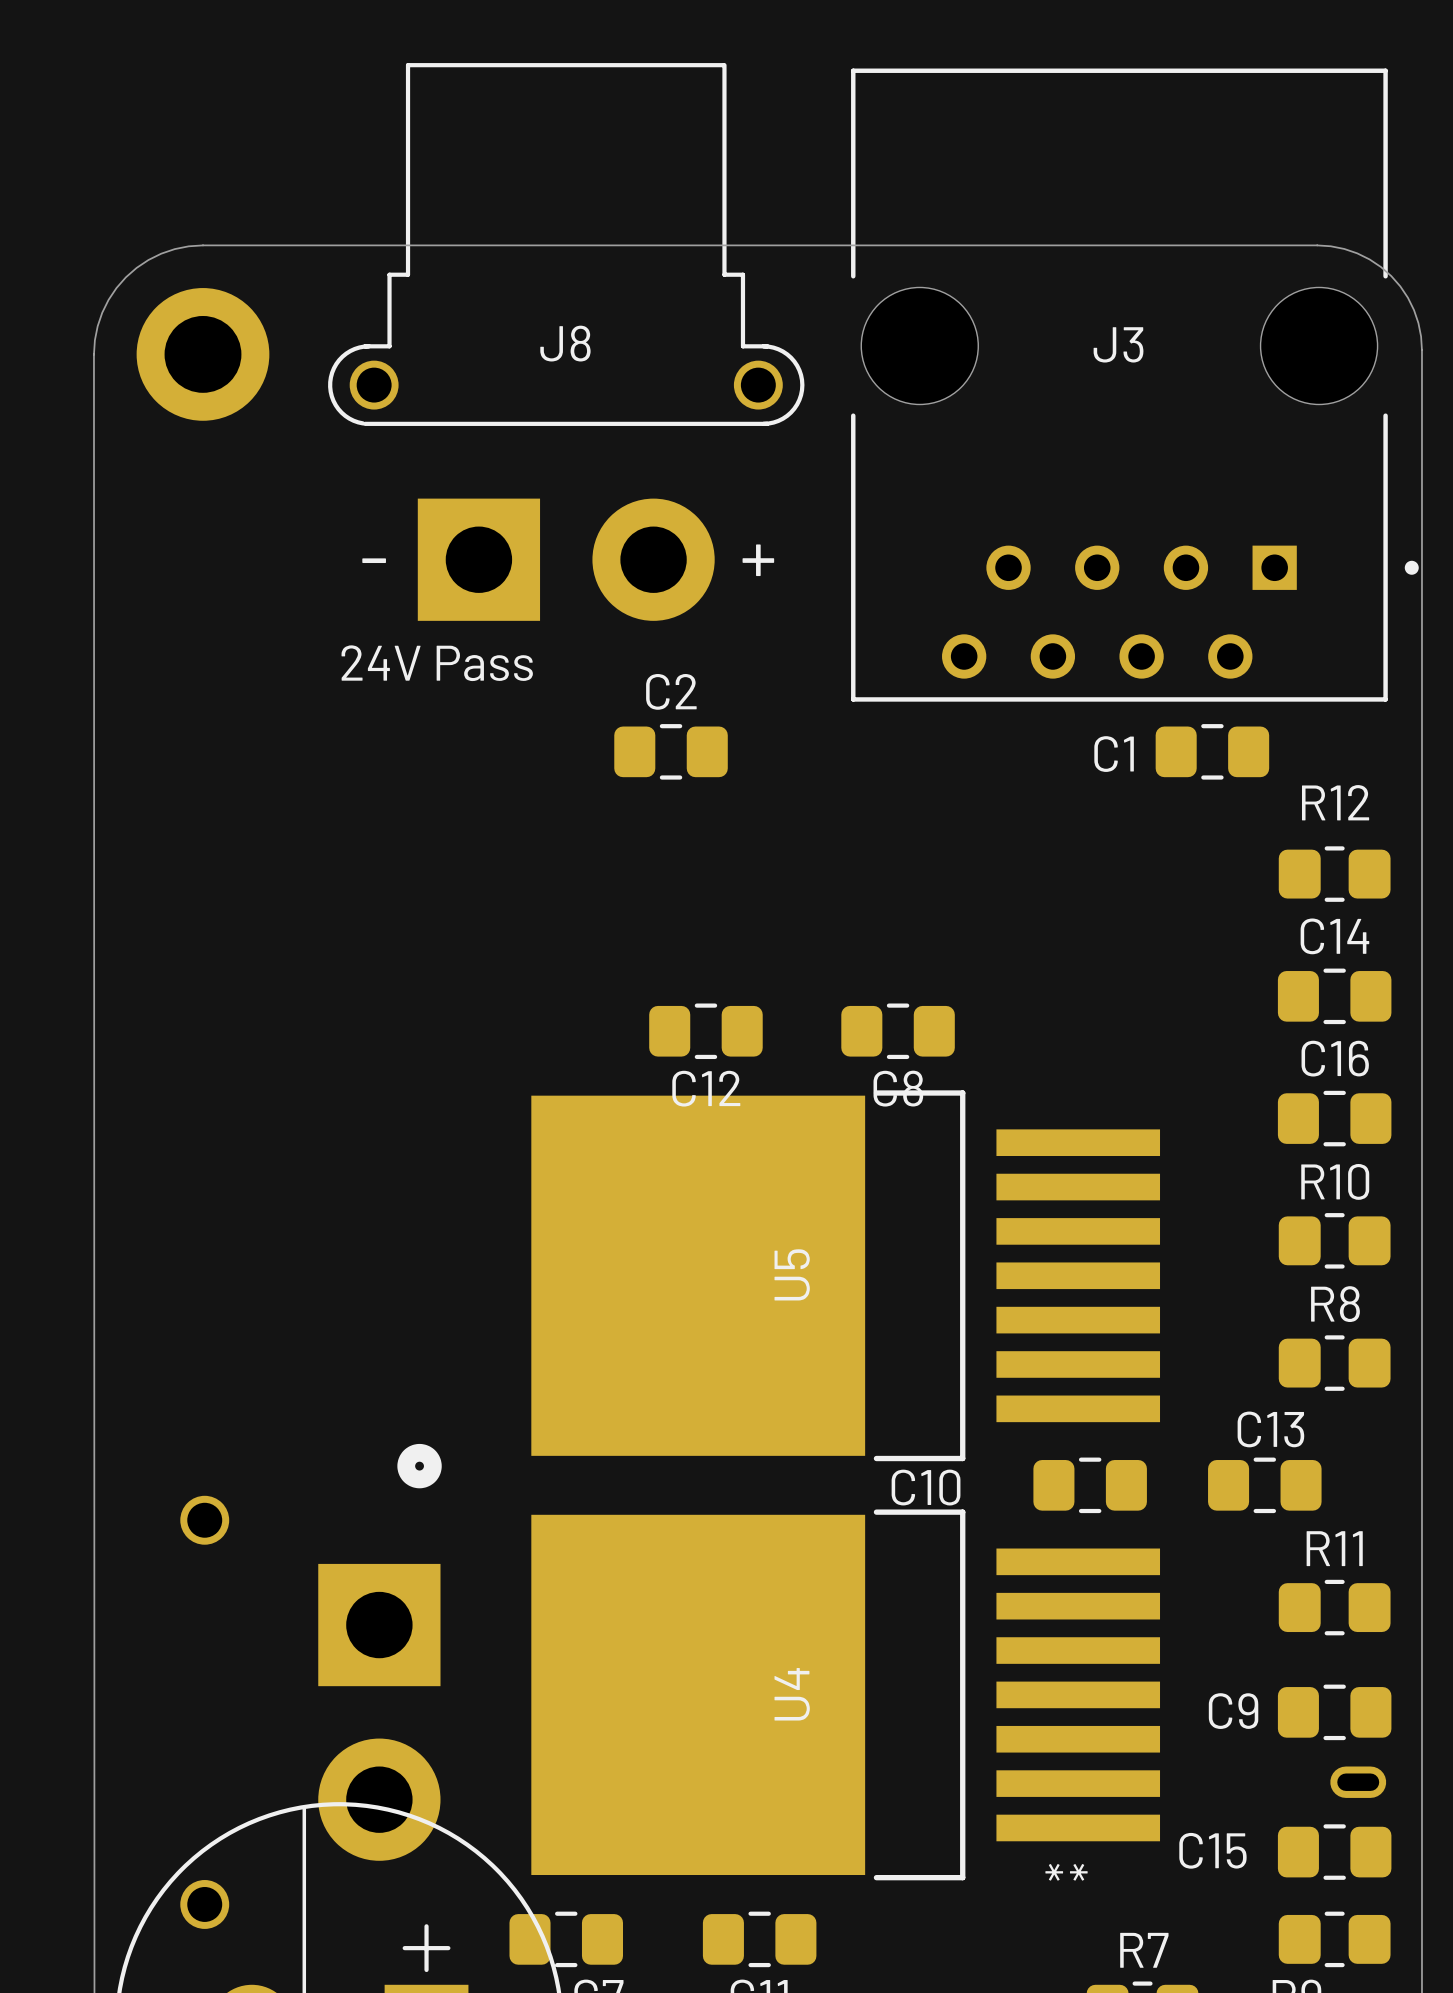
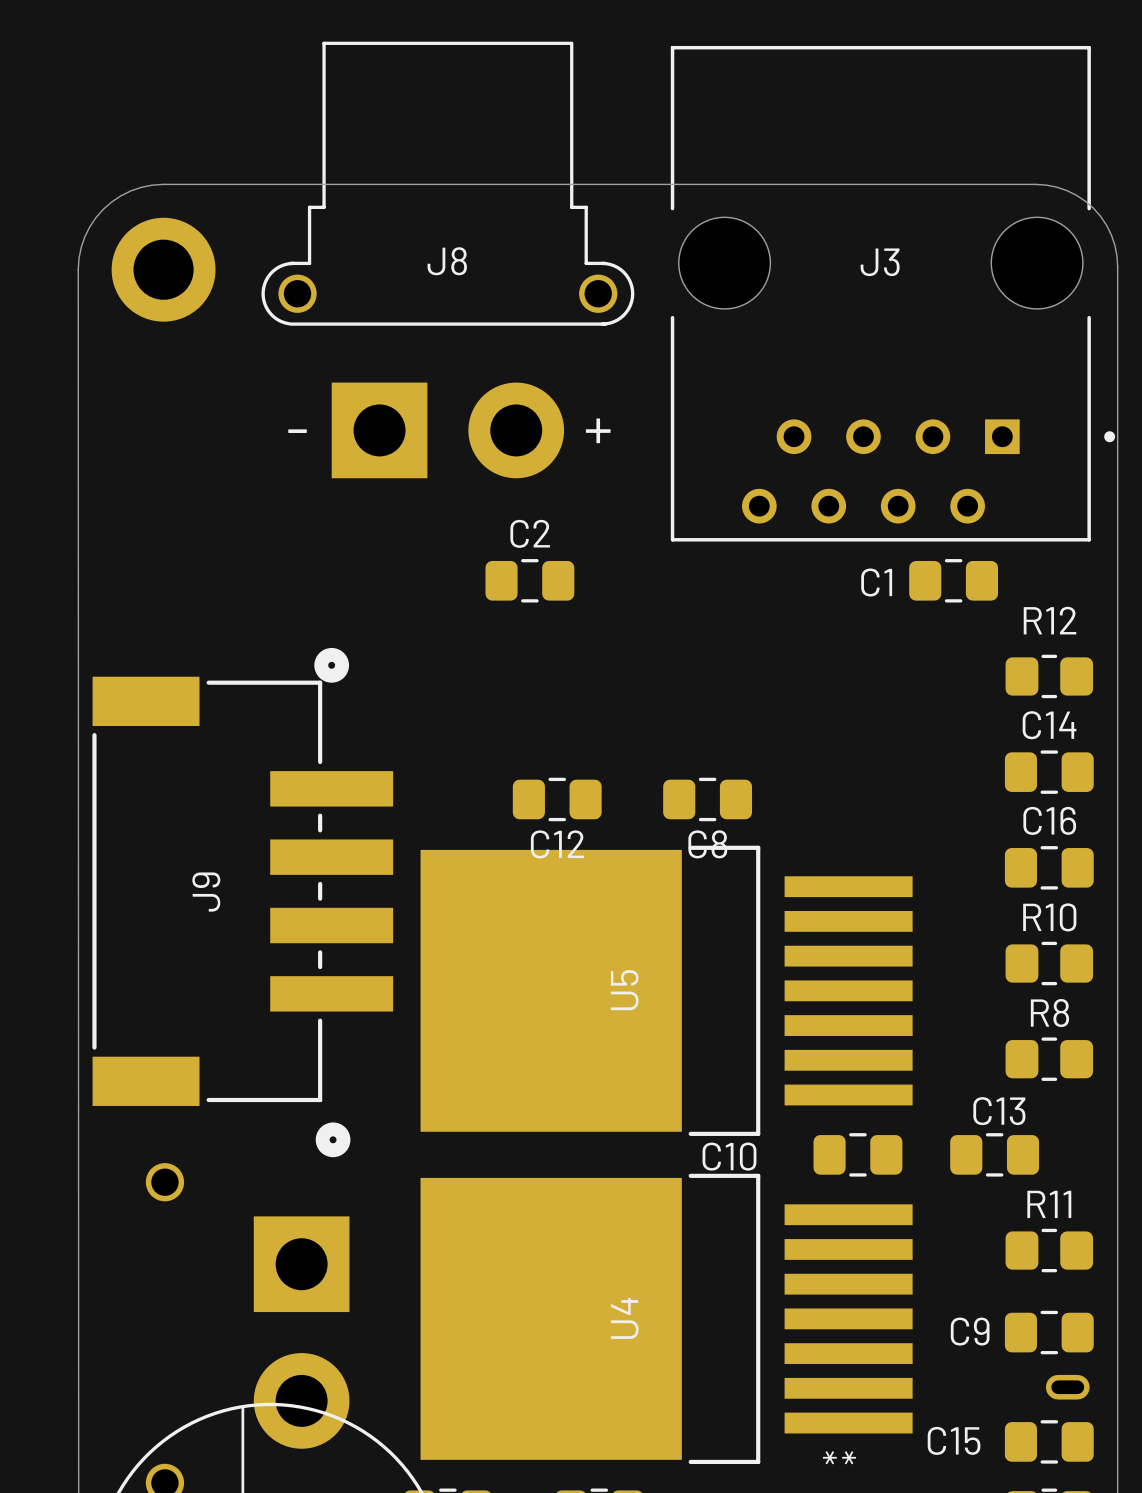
text: 24V Pass (437, 663) -> none
J9: none -> (242, 876)

